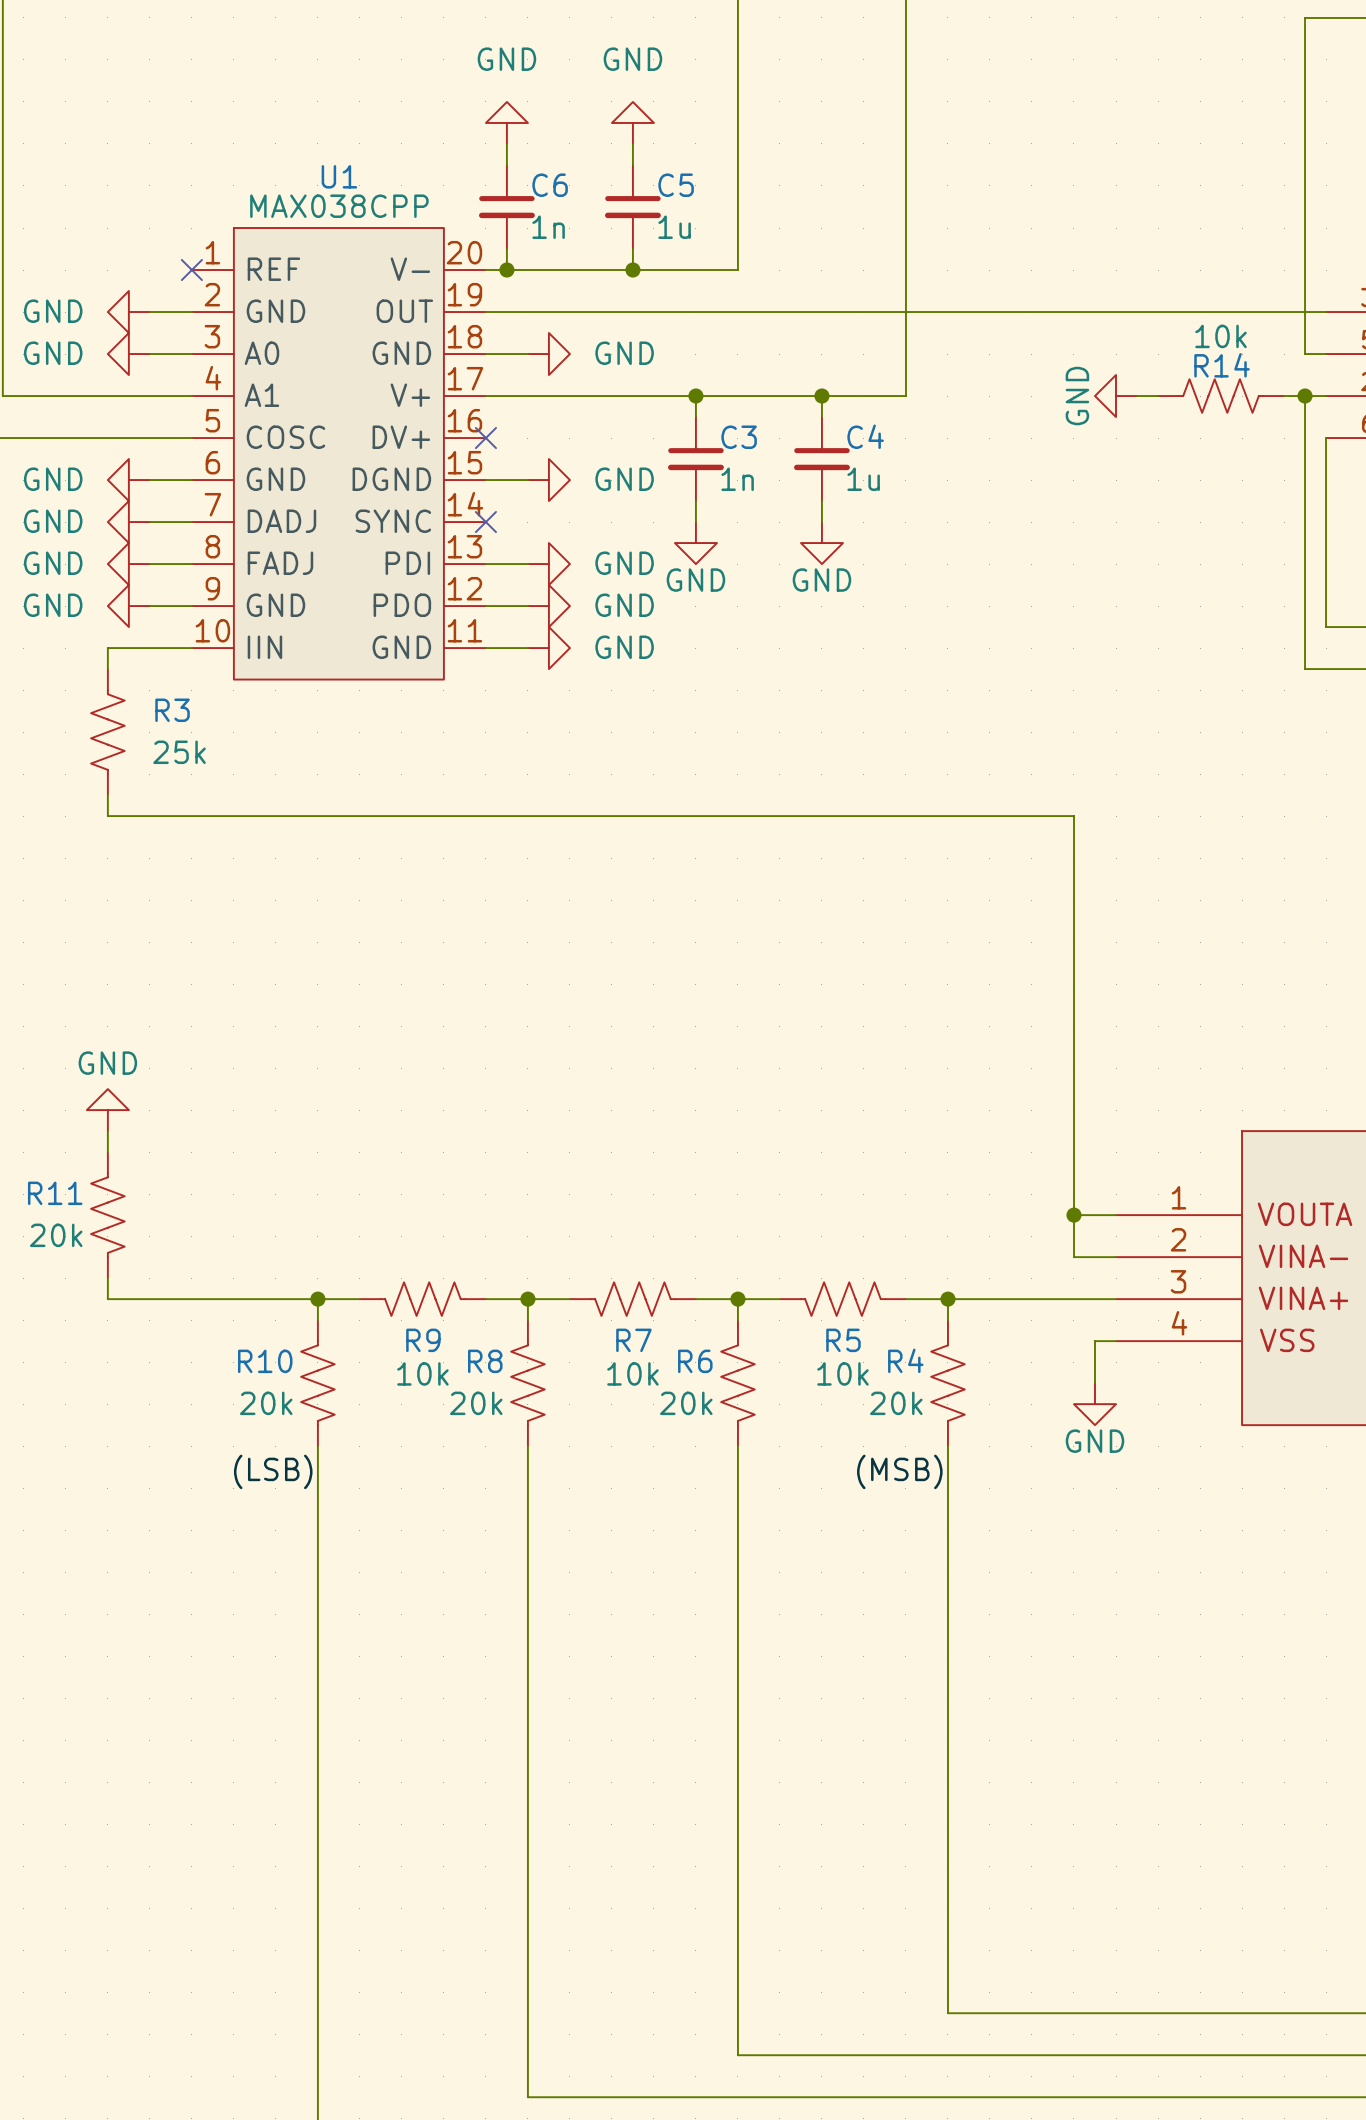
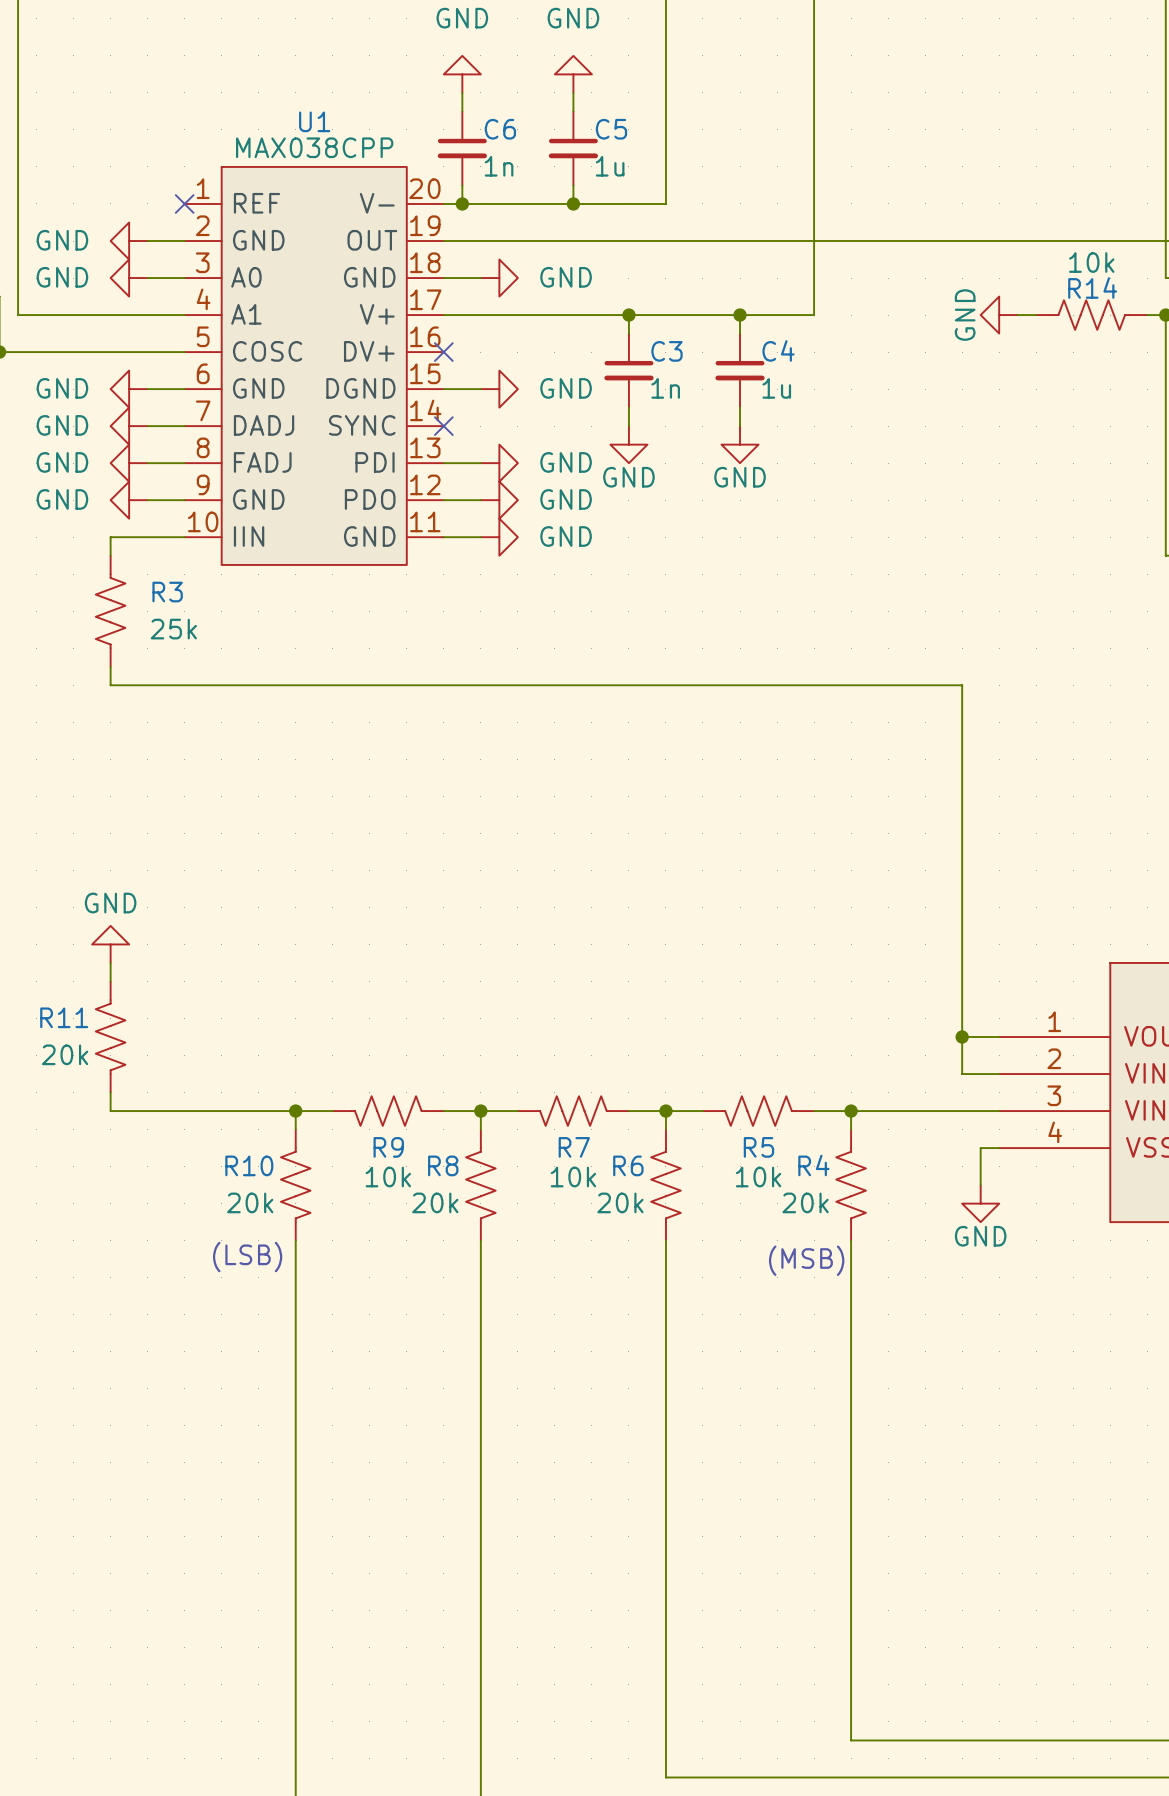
text: none -> (LSB) (247, 1257)
text: none -> (MSB) (806, 1260)
label: (LSB) (273, 1471) -> none
label: (MSB) (899, 1471) -> none

